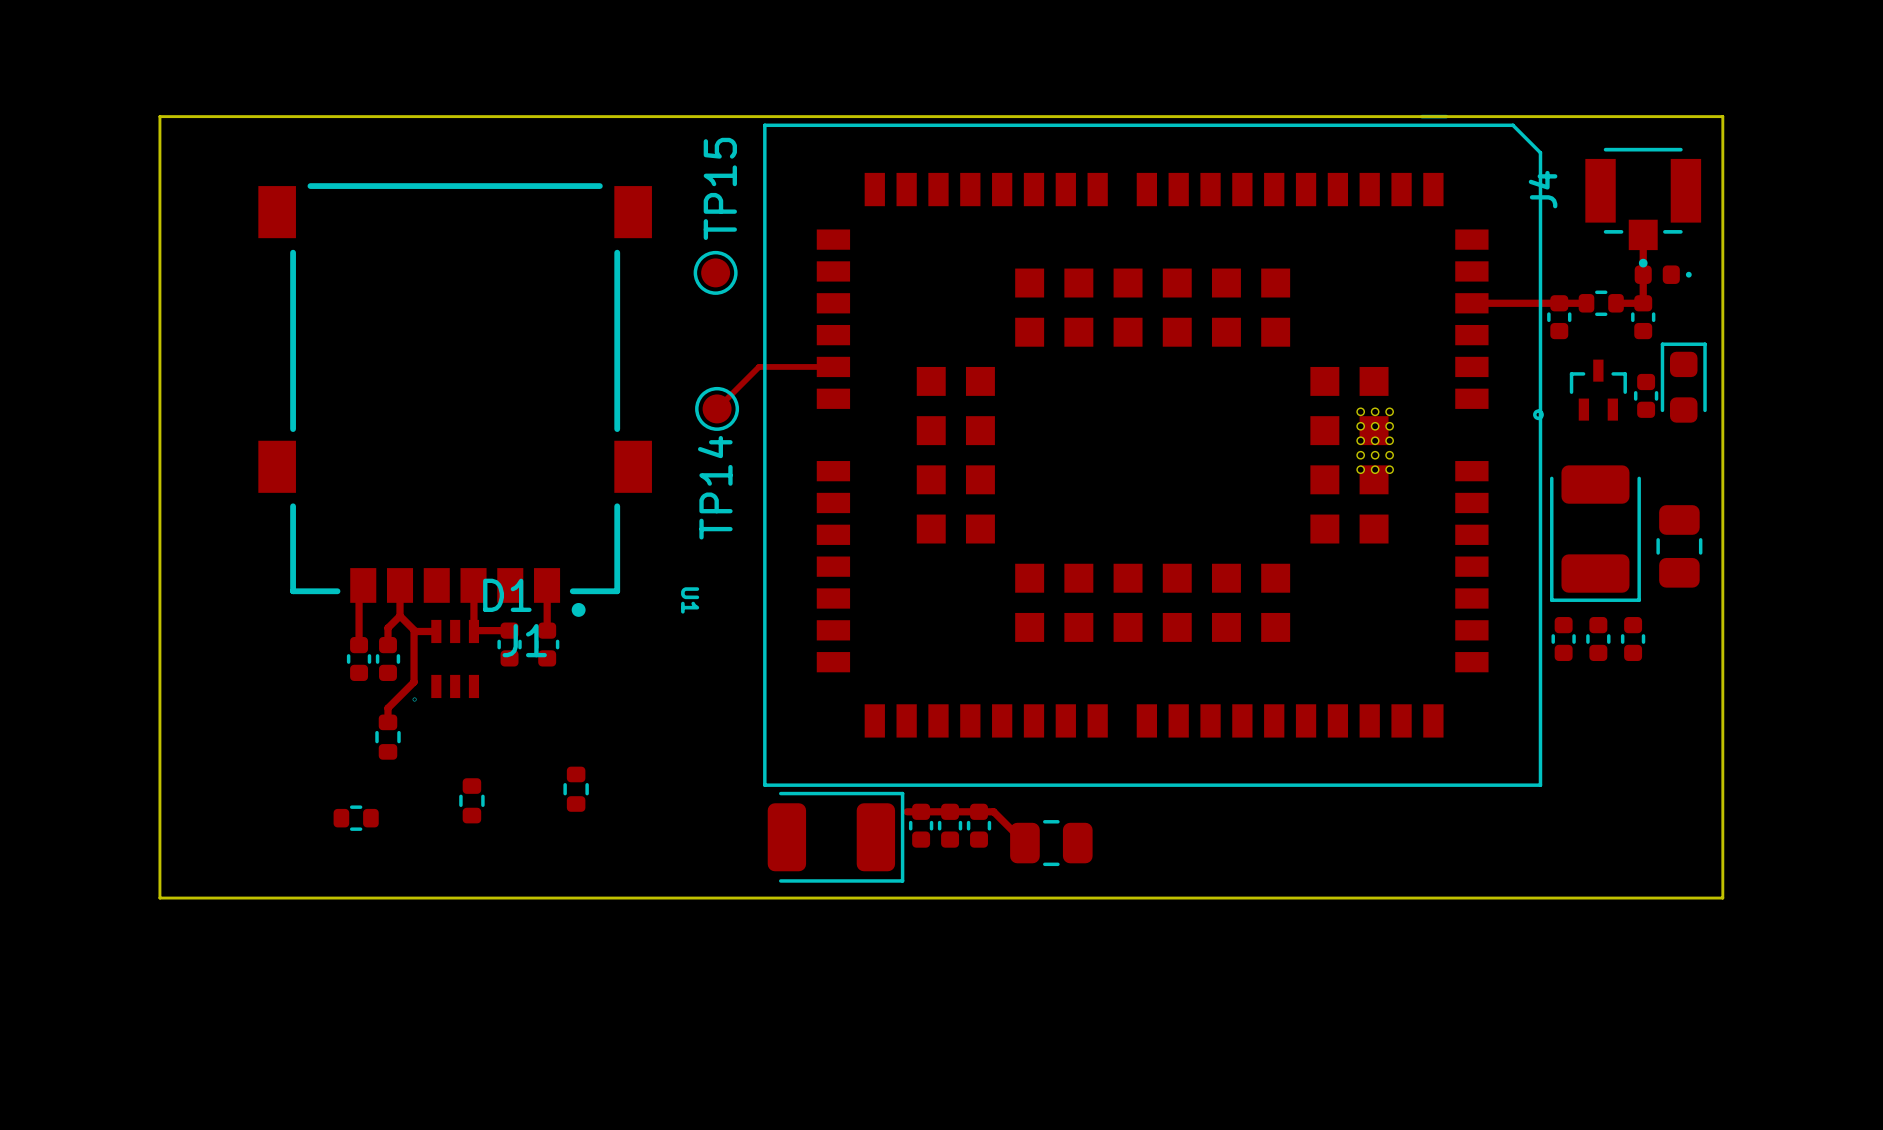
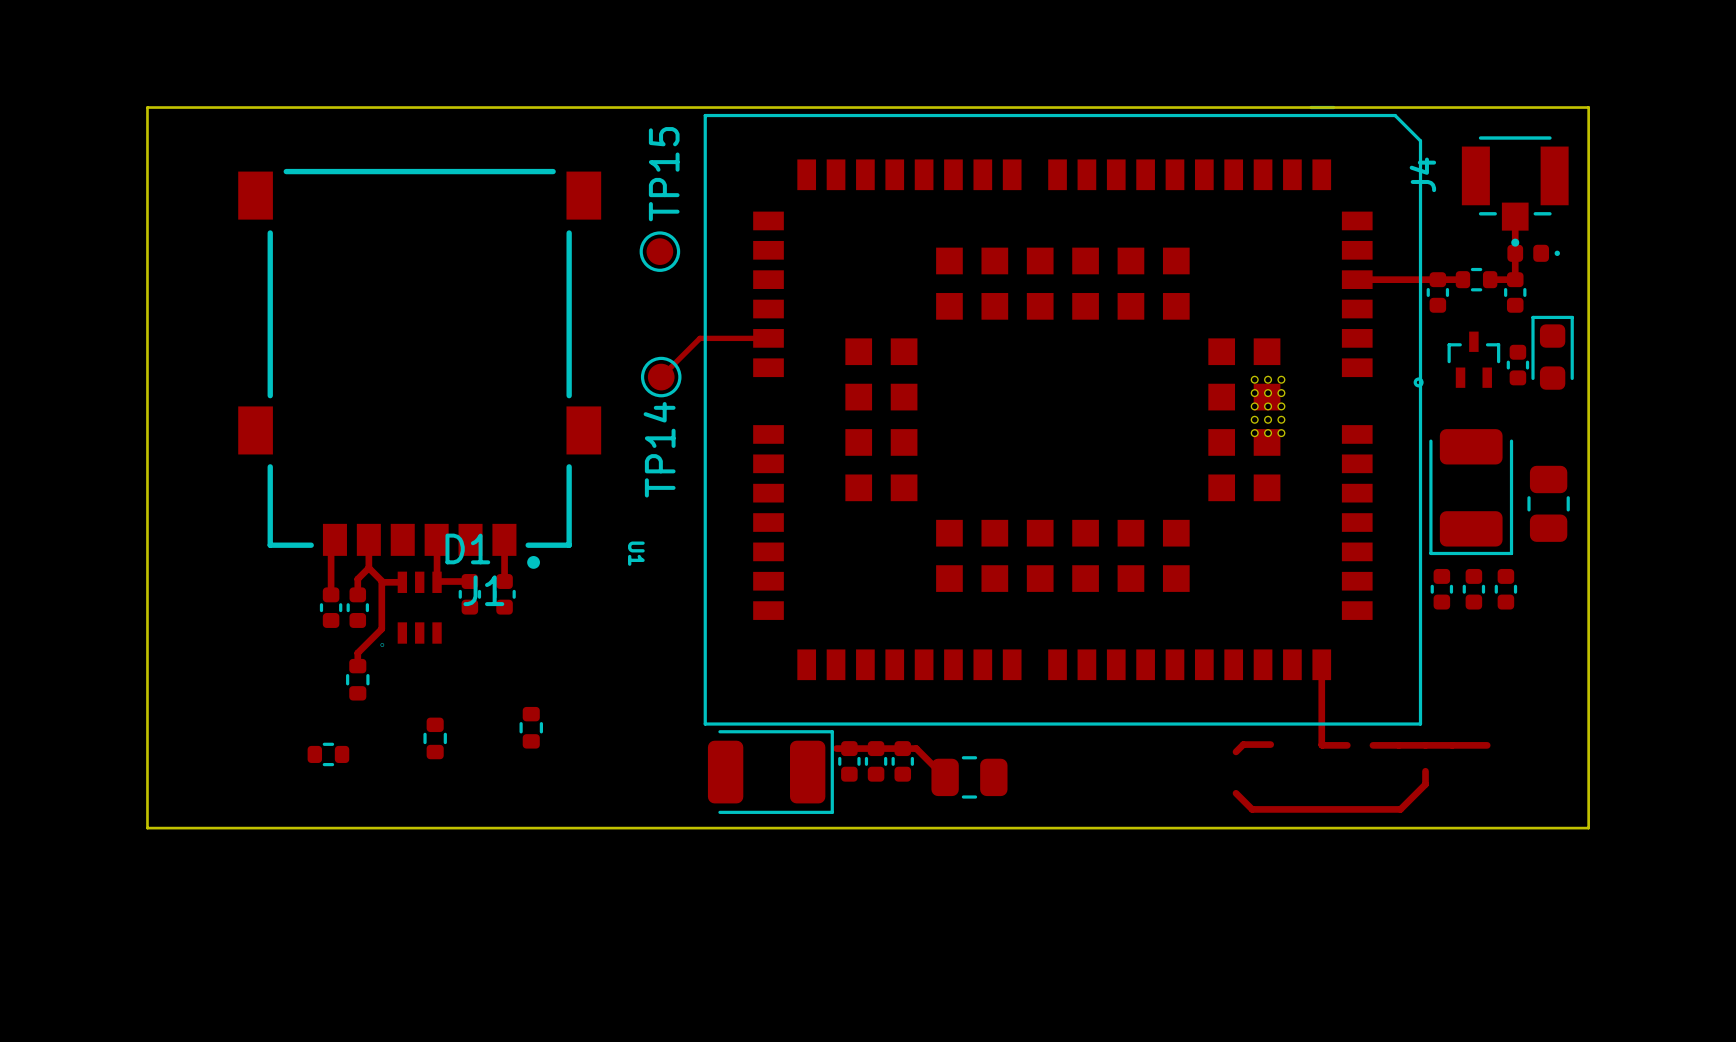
track: none -> (1321, 664) (1321, 744) (1347, 745)
track: none -> (1270, 744) (1243, 744) (1236, 751)
track: none -> (1372, 745) (1487, 745)
track: none -> (1425, 771) (1425, 784) (1400, 809) (1252, 809) (1236, 793)

